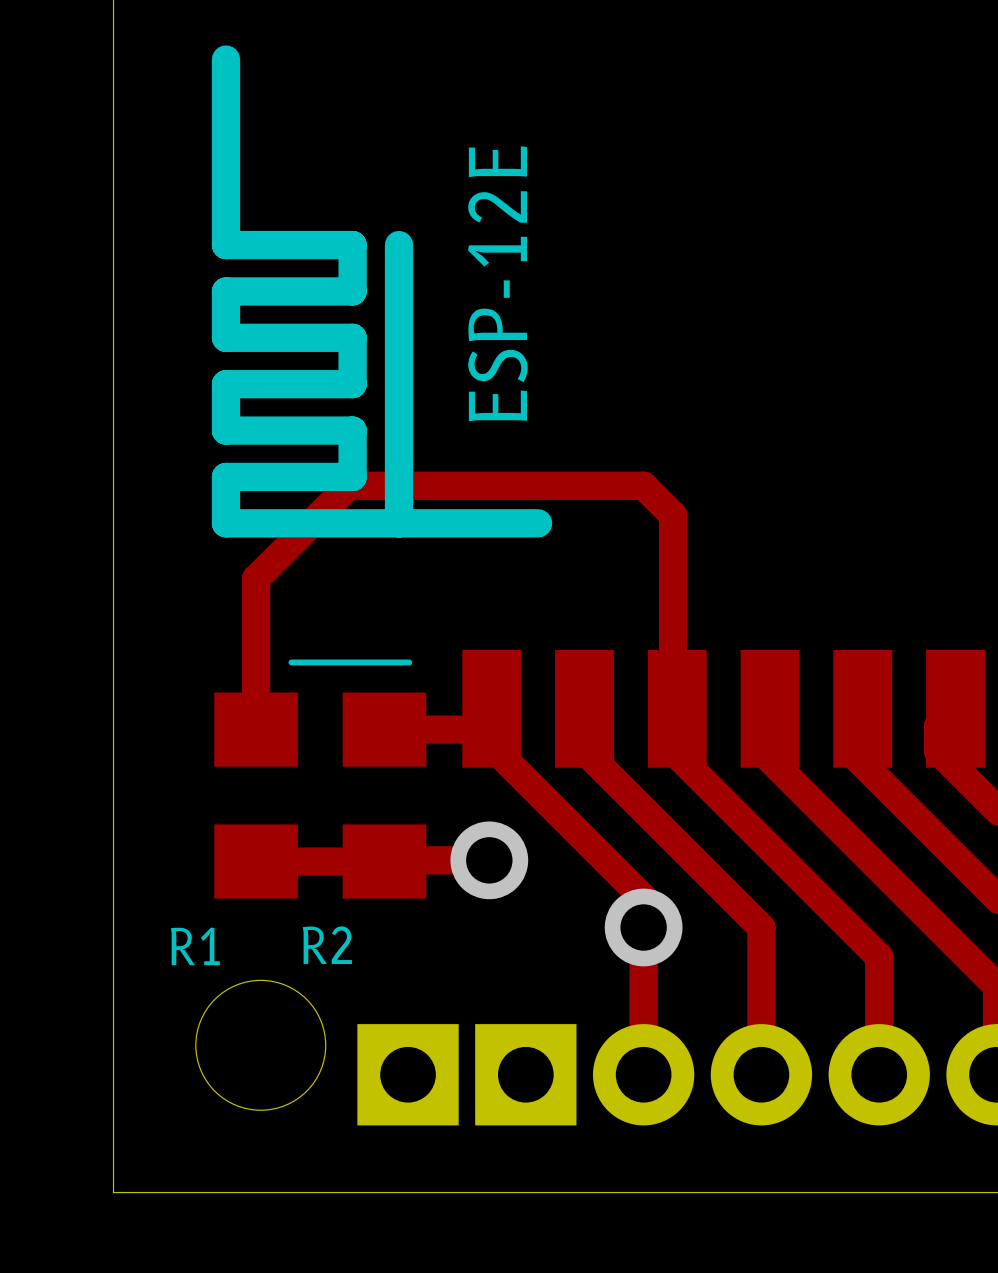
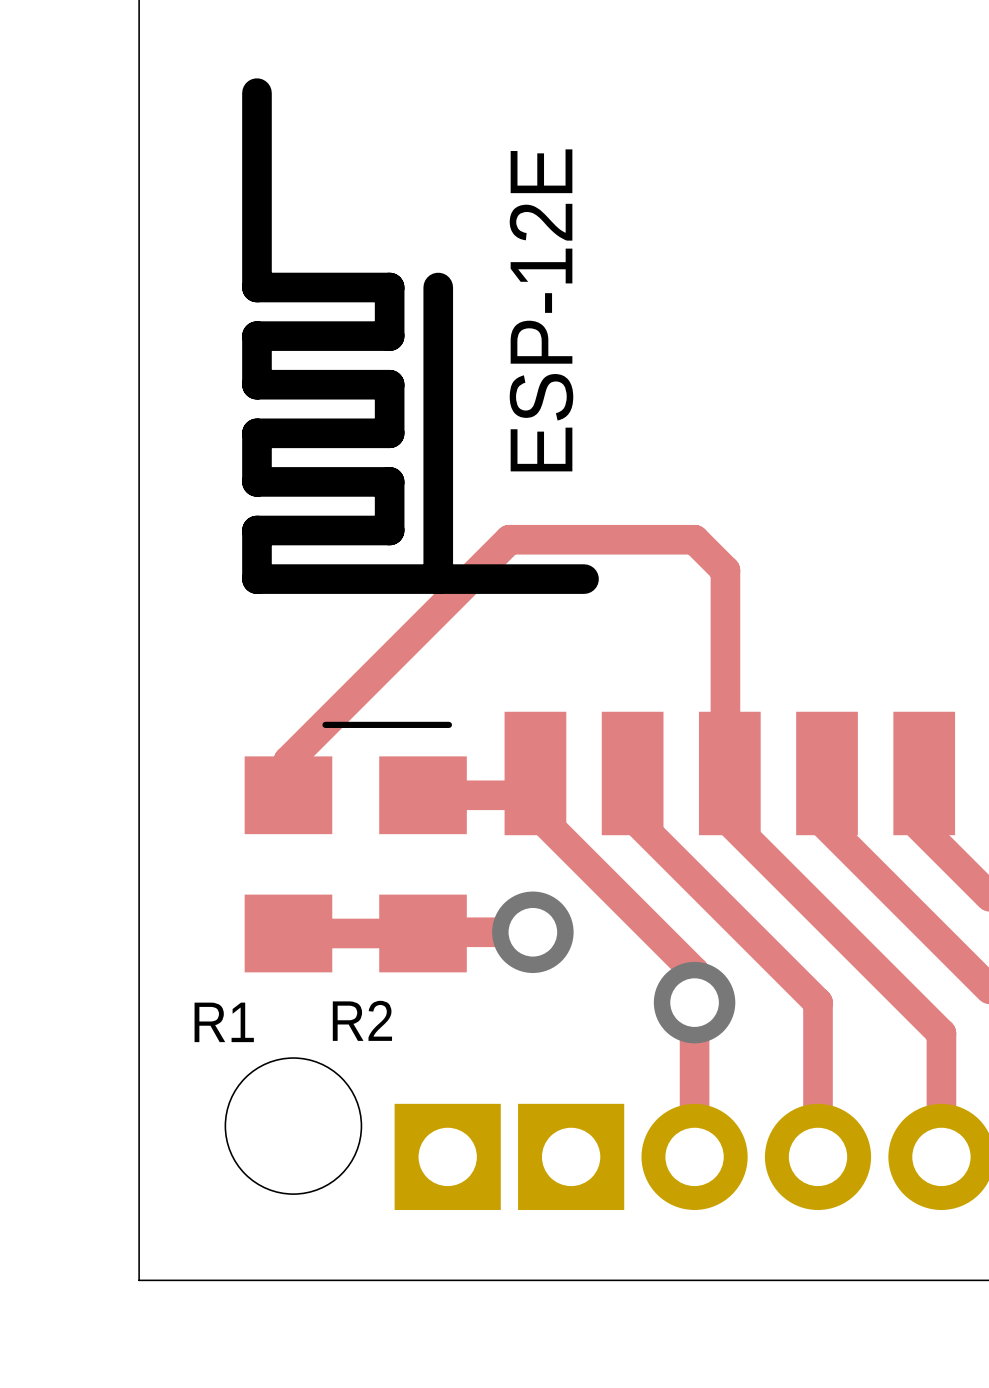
track: (466, 485) (349, 485) (256, 578) (256, 696) -> (509, 539) (288, 760)

